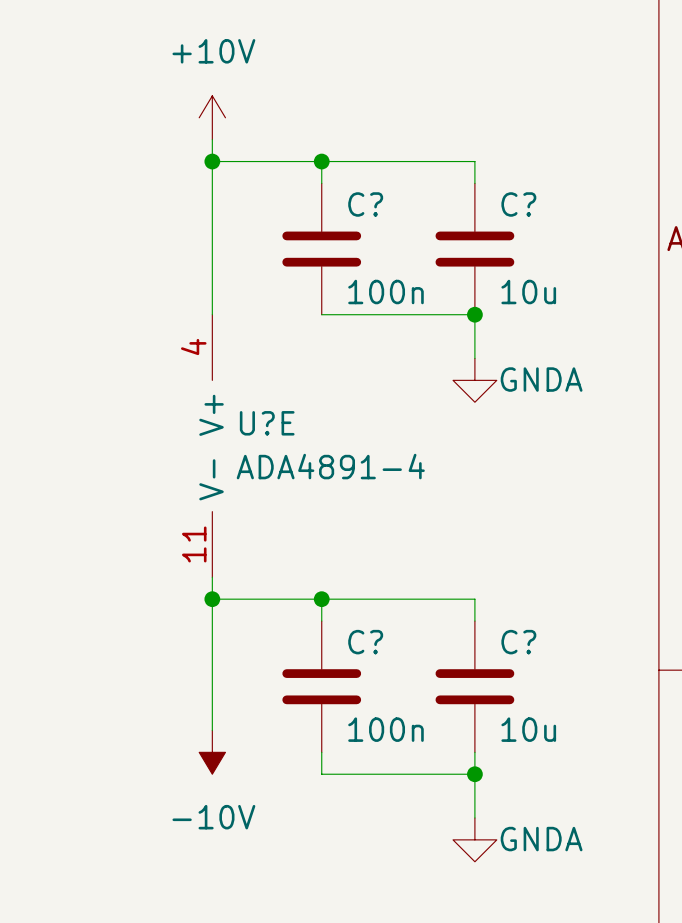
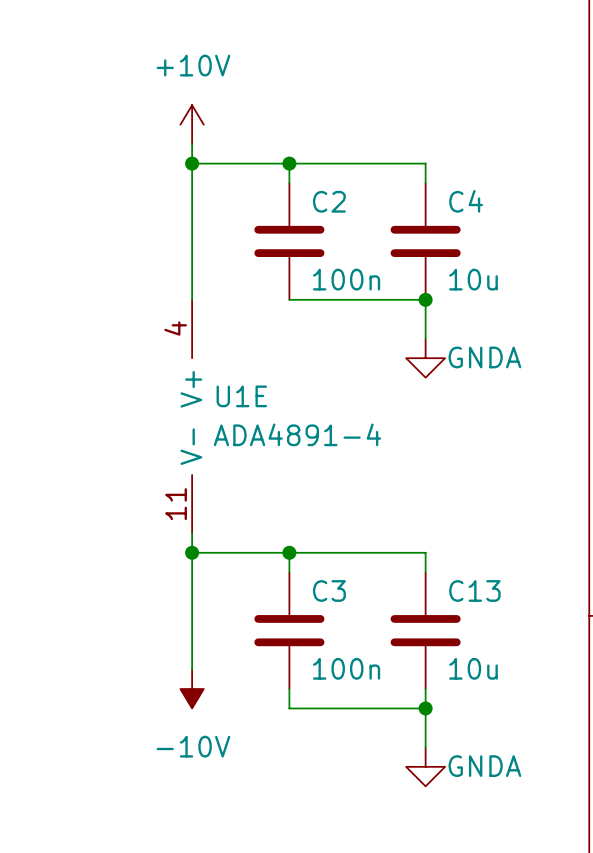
C? name: C? (365, 204) -> C2 (329, 201)
C? name: C? (518, 204) -> C4 (466, 201)
U?E name: U?E (267, 423) -> U1E (241, 396)
C? name: C? (365, 642) -> C3 (329, 590)
C? name: C? (518, 642) -> C13 (474, 590)

